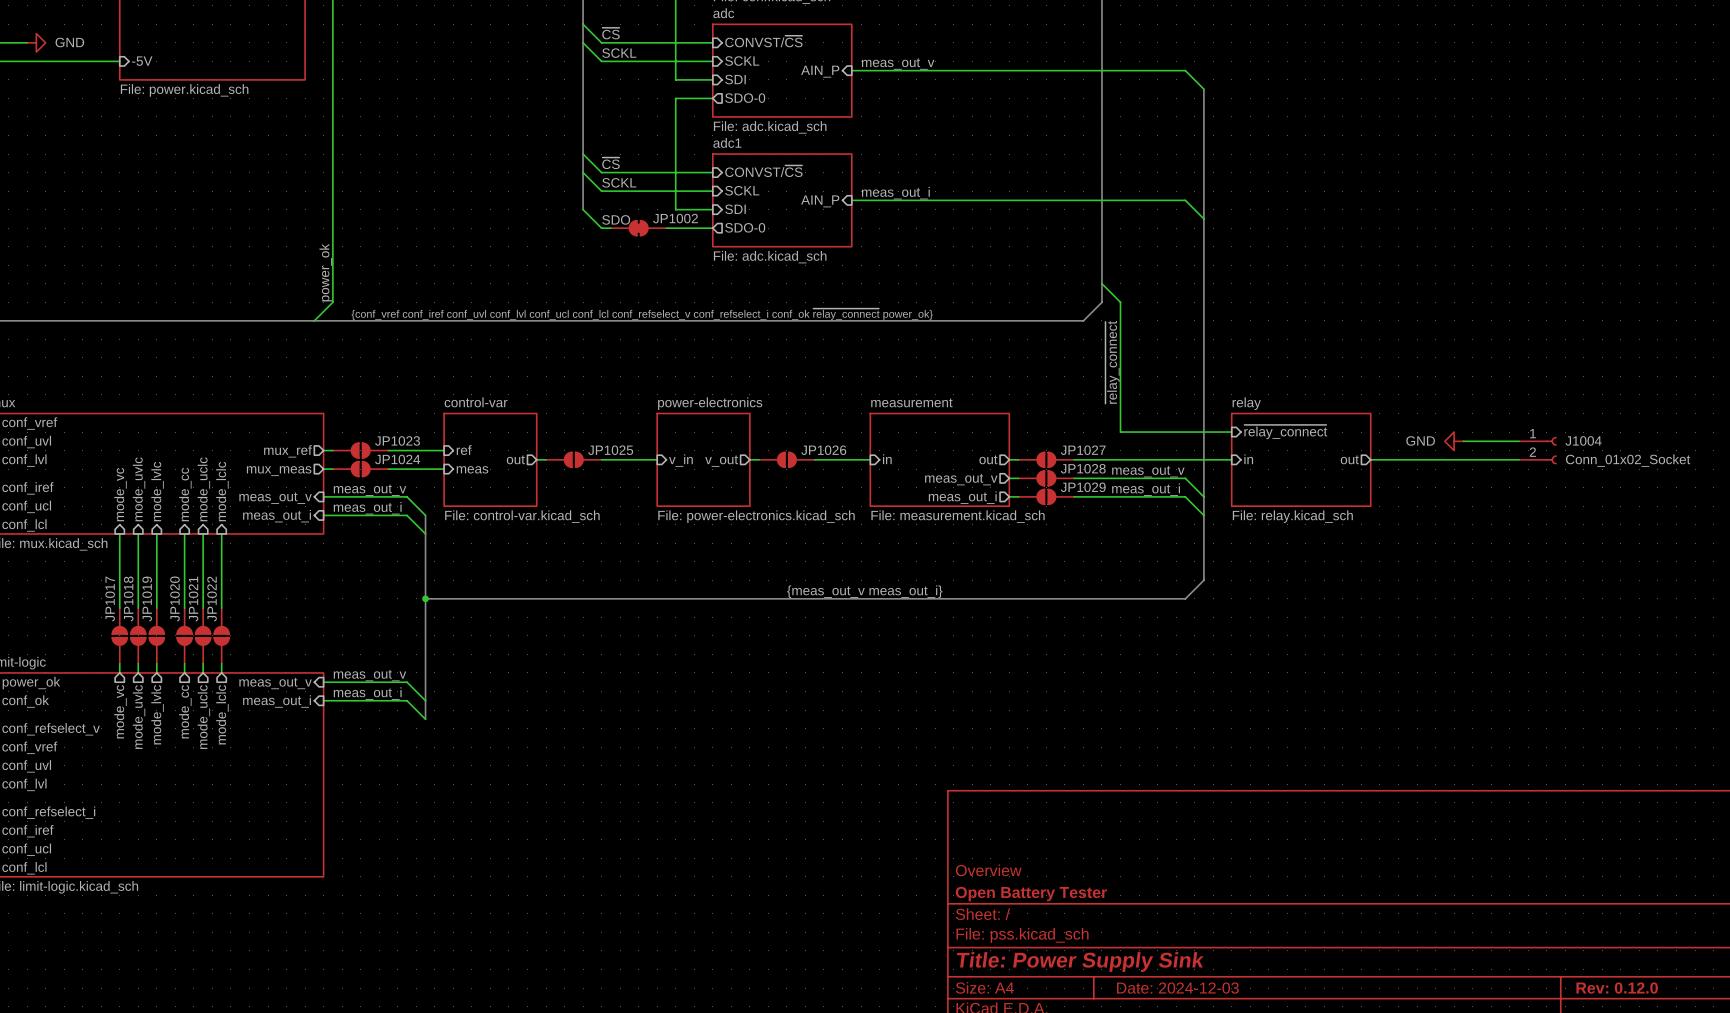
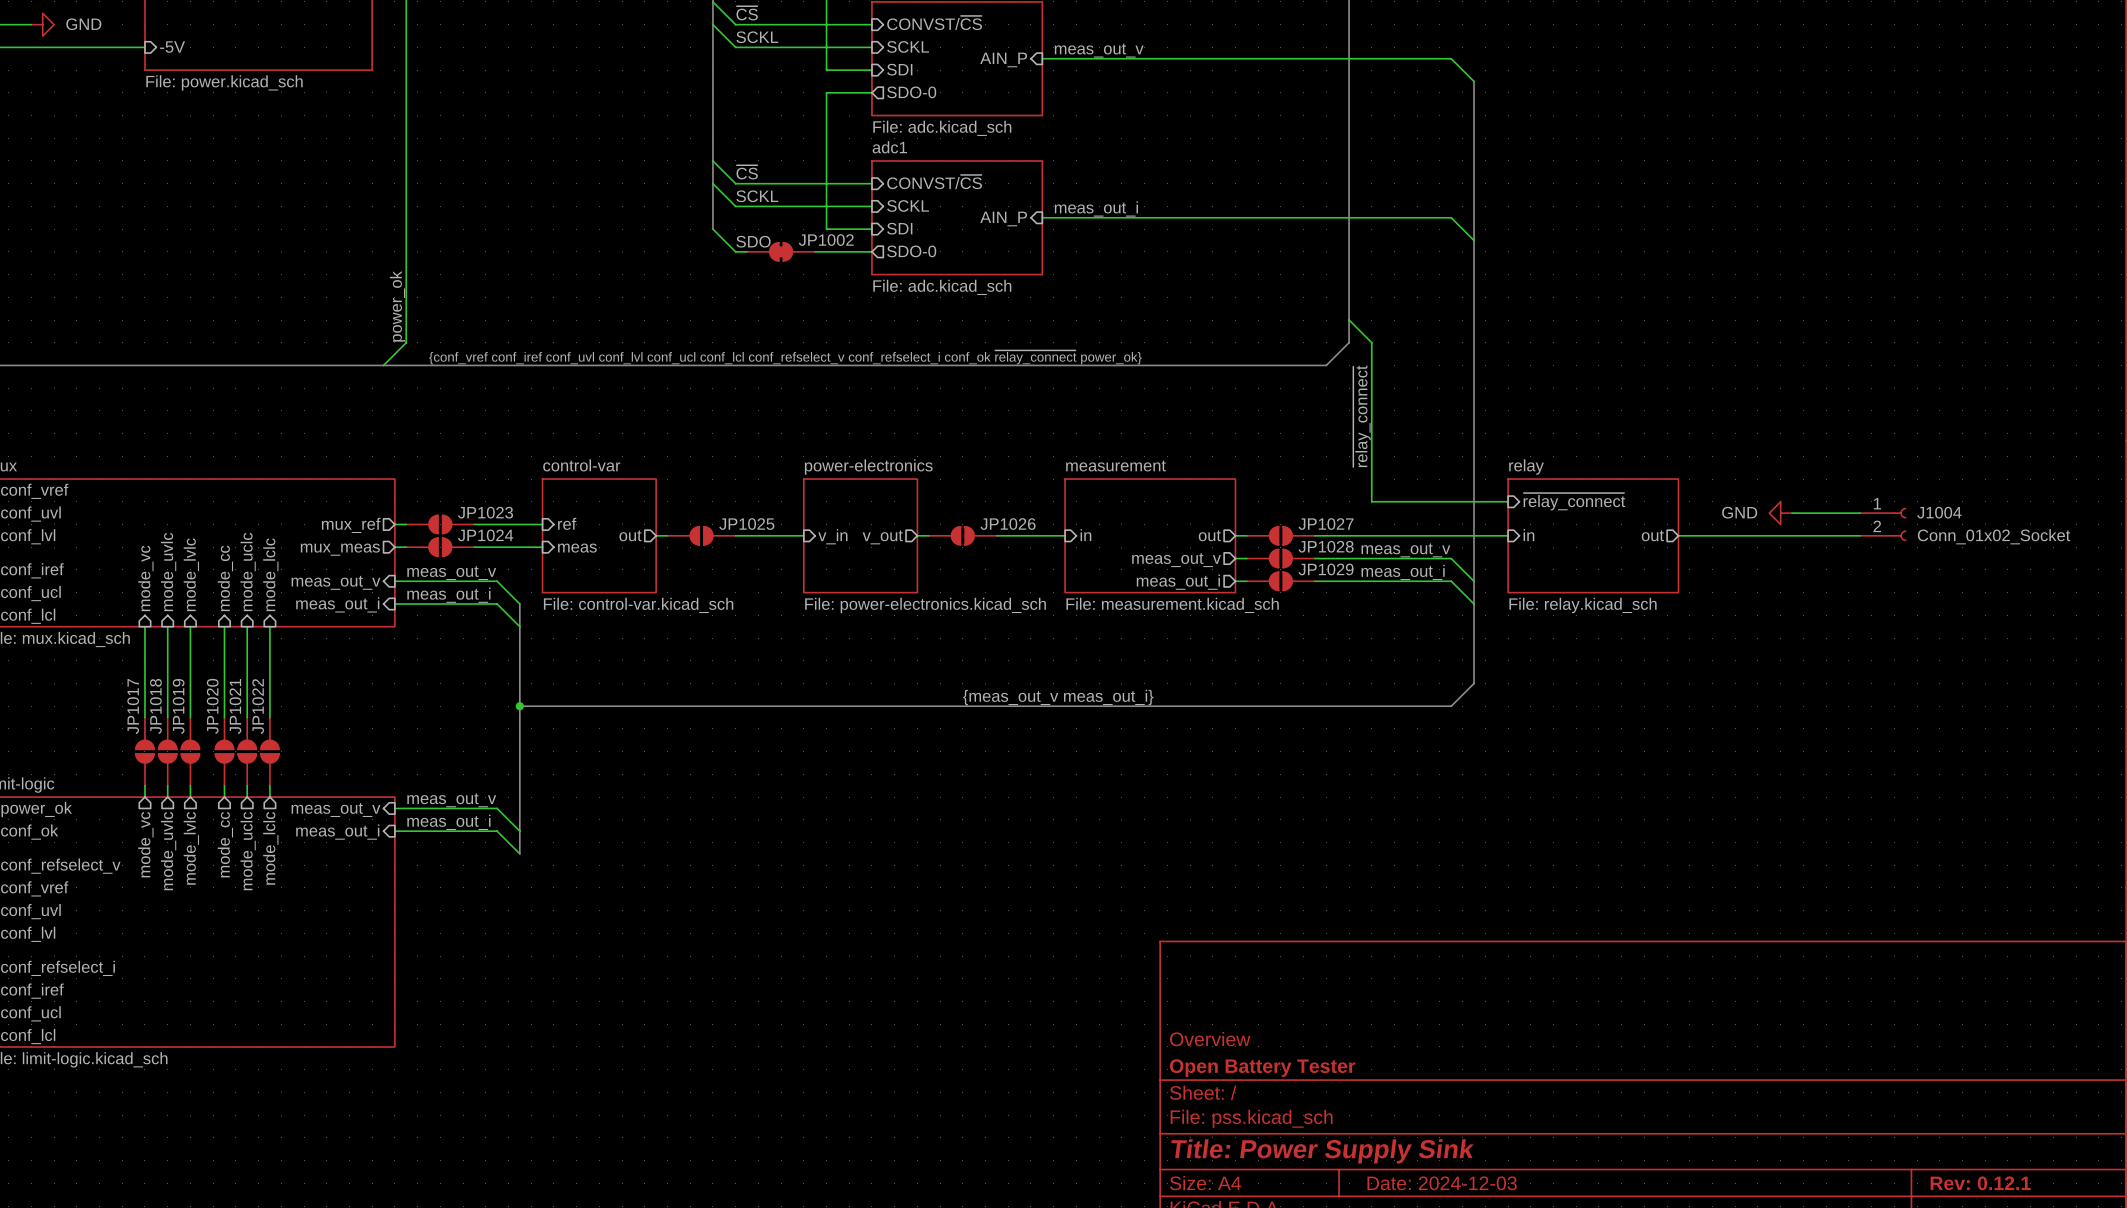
title block: Rev: 0.12.0 (1617, 988) -> Rev: 0.12.1 (1980, 1183)

